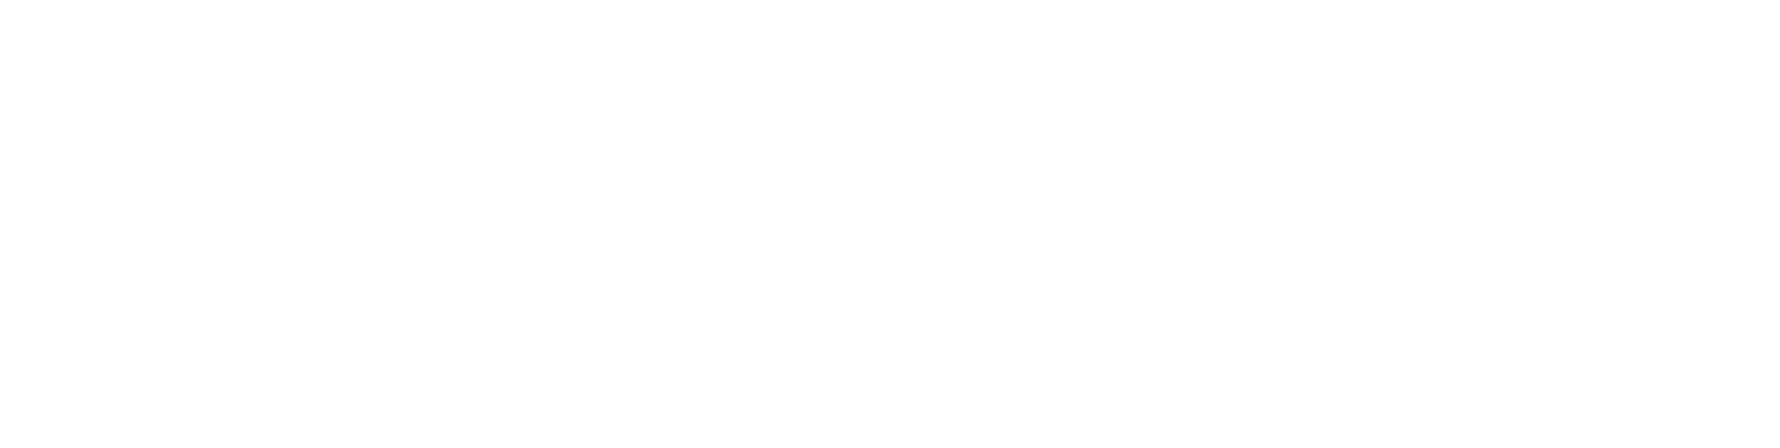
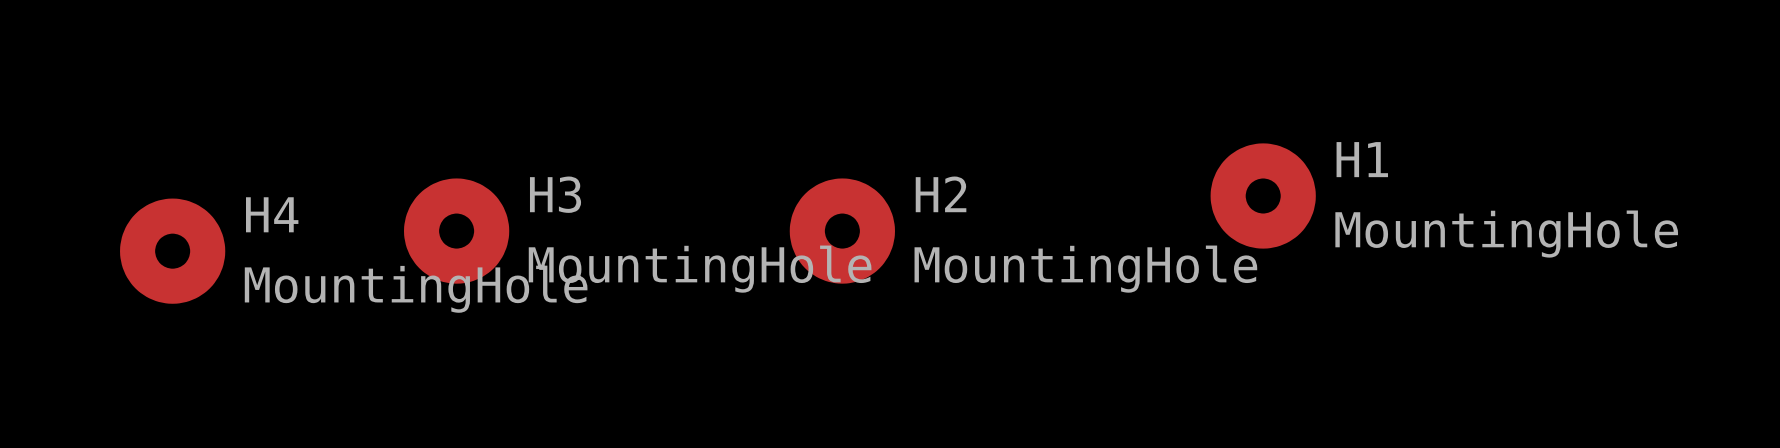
H1: none -> MountingHole (1263, 195)
H3: none -> MountingHole (456, 231)
H2: none -> MountingHole (842, 231)
H4: none -> MountingHole (172, 251)

